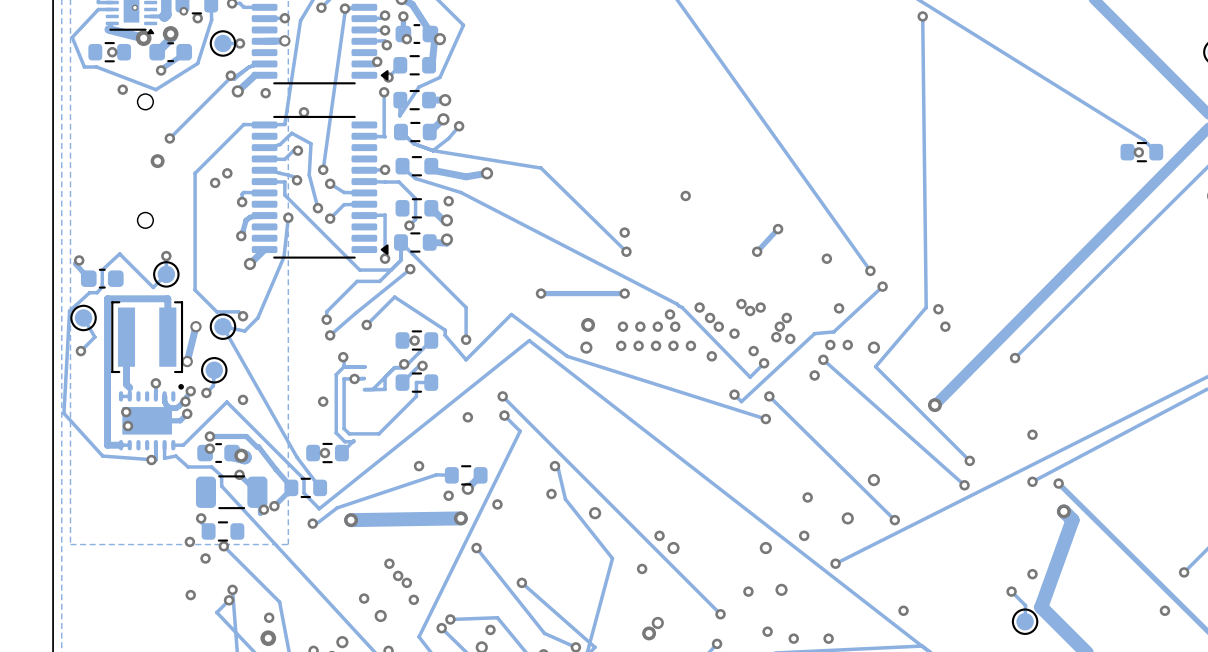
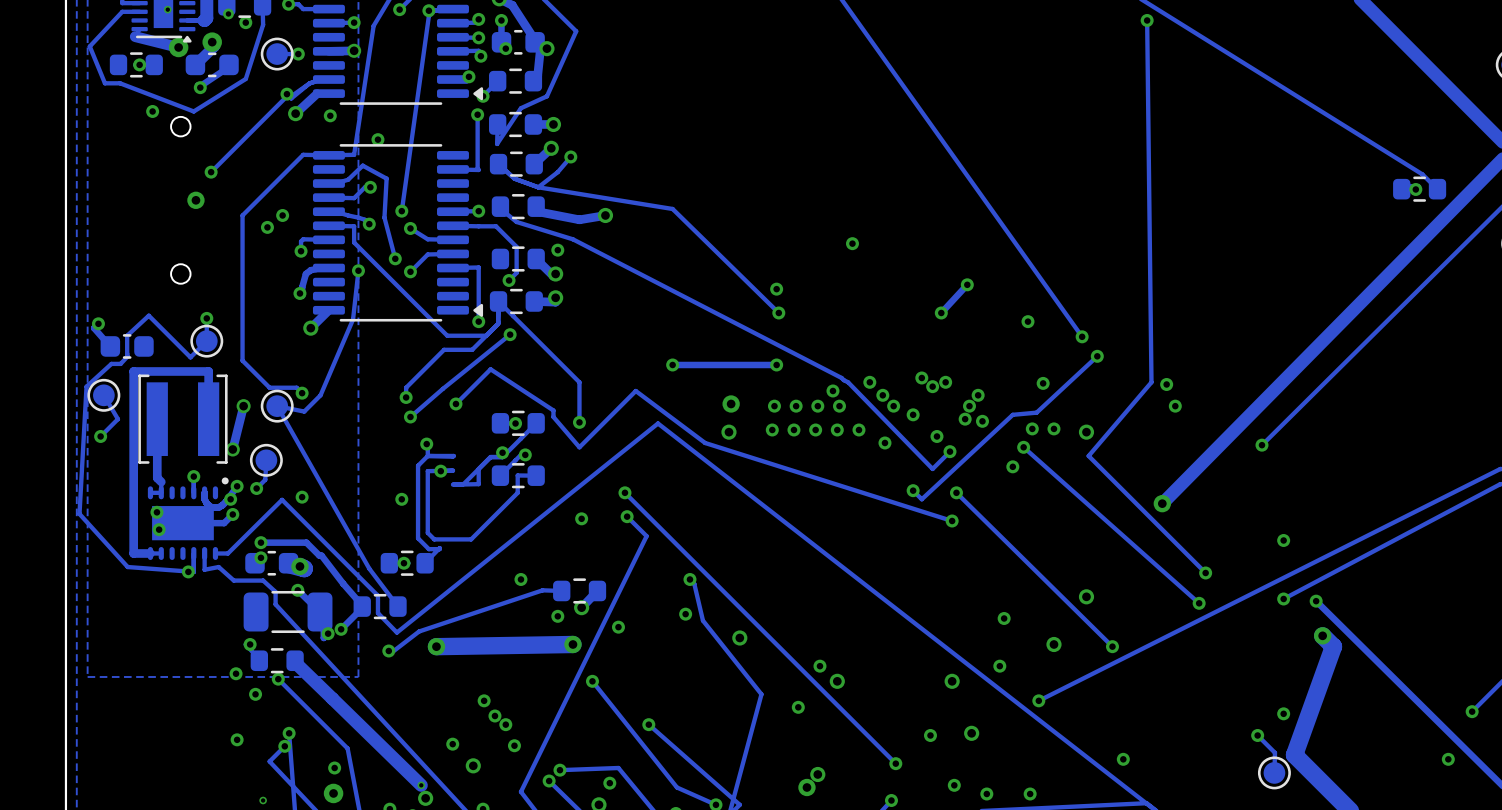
track: none -> (297, 664) (421, 785)
via: none -> (421, 785)
via: none -> (263, 800)

